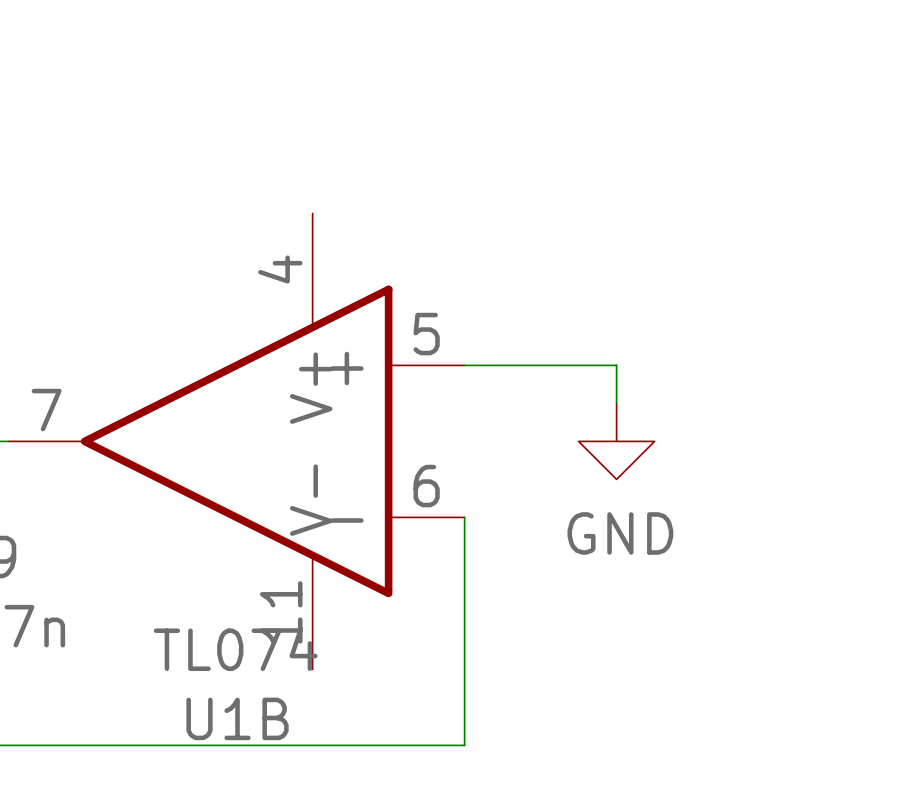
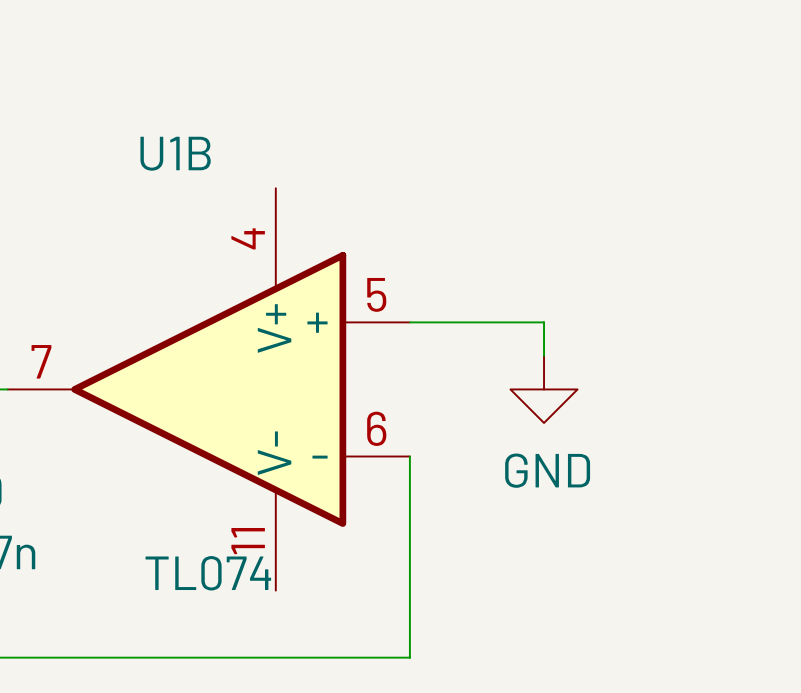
U1B name position: U1B (237, 718) -> U1B (175, 153)

